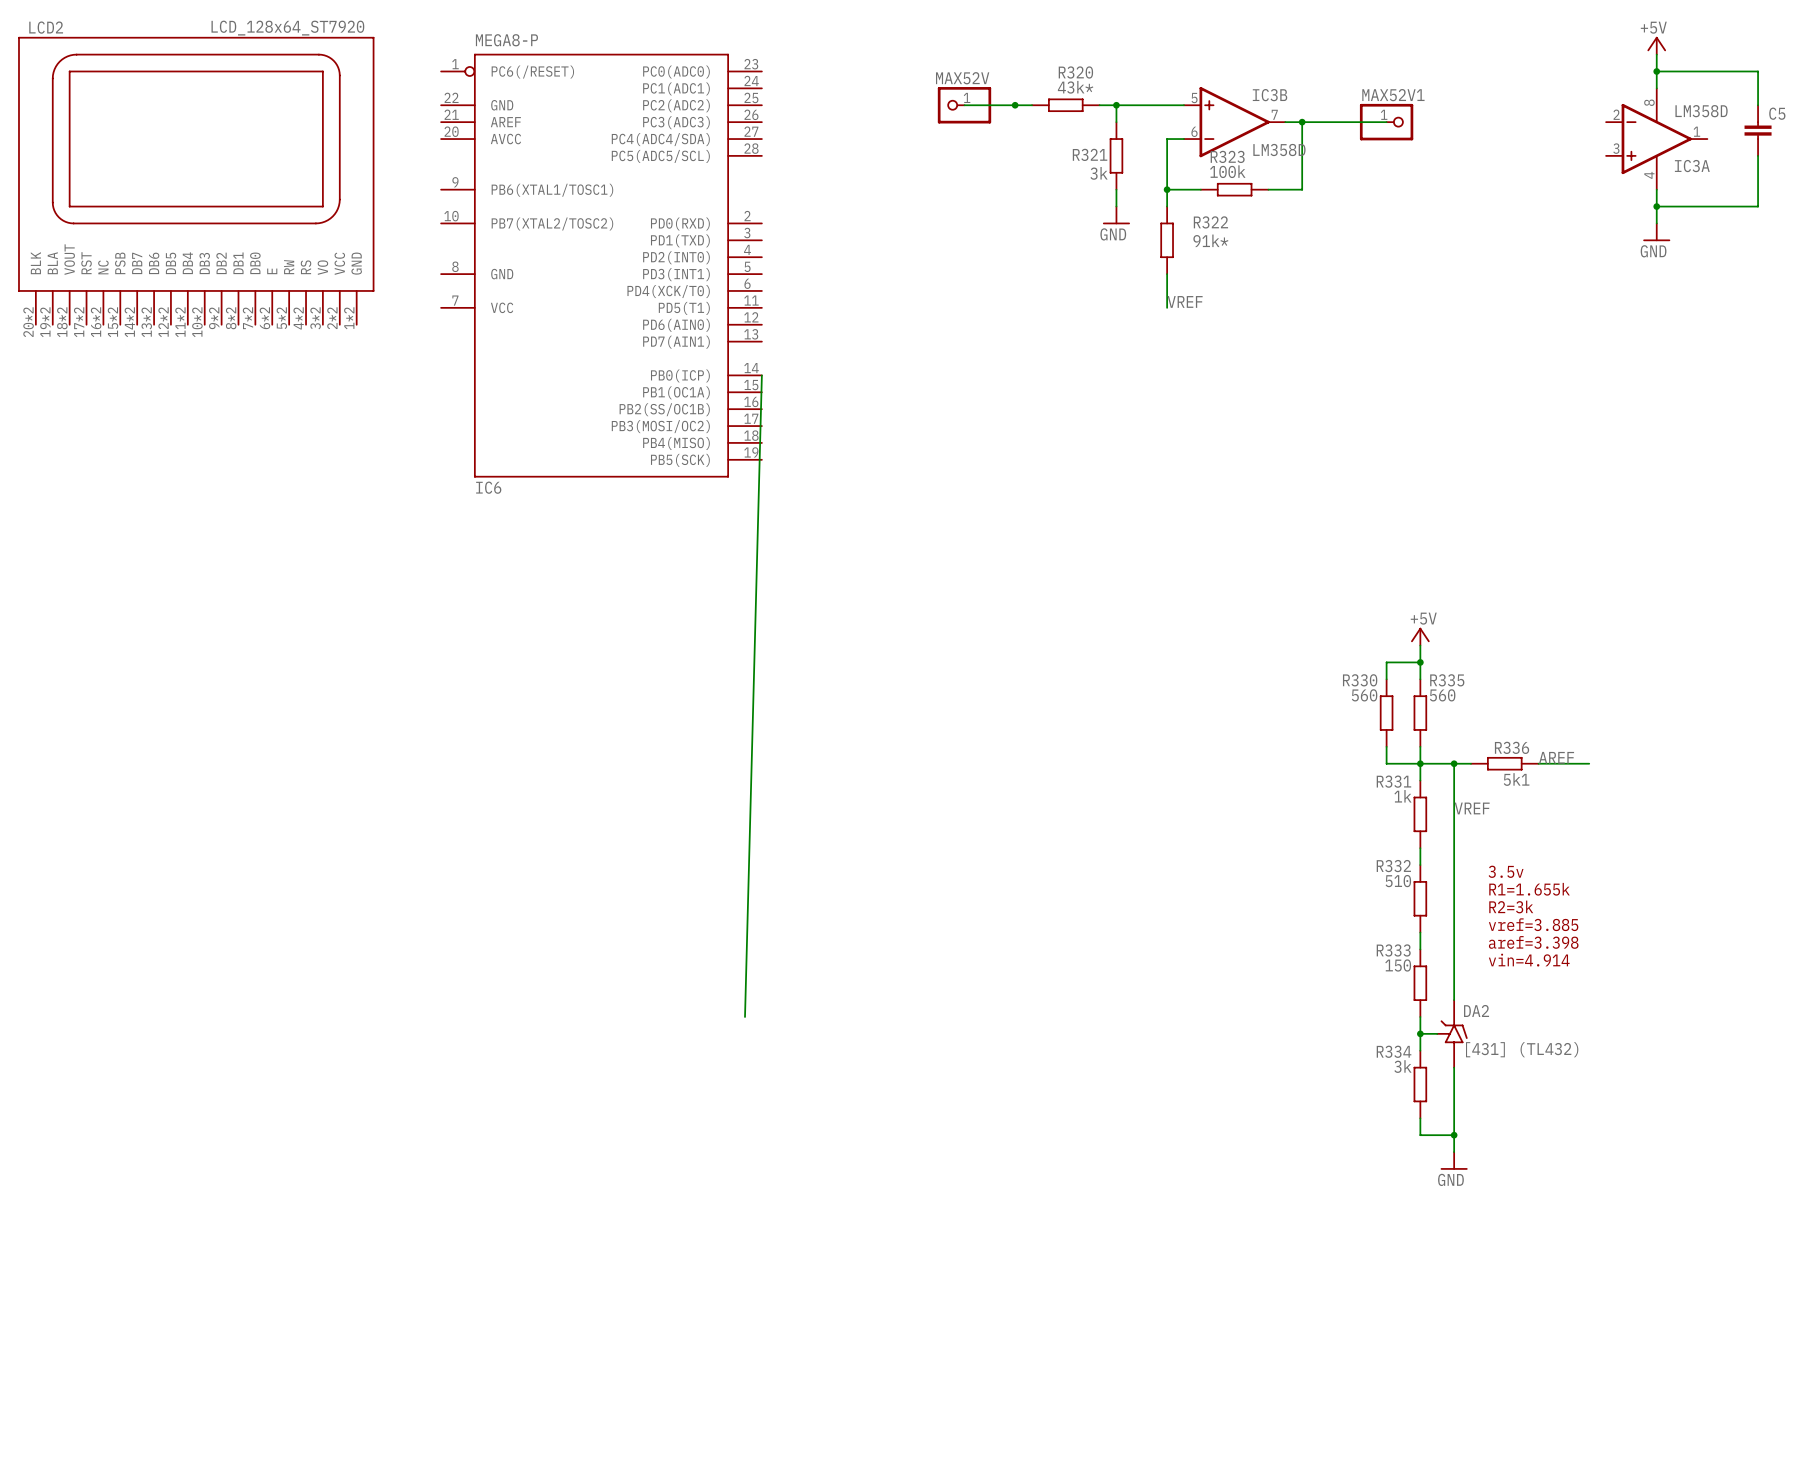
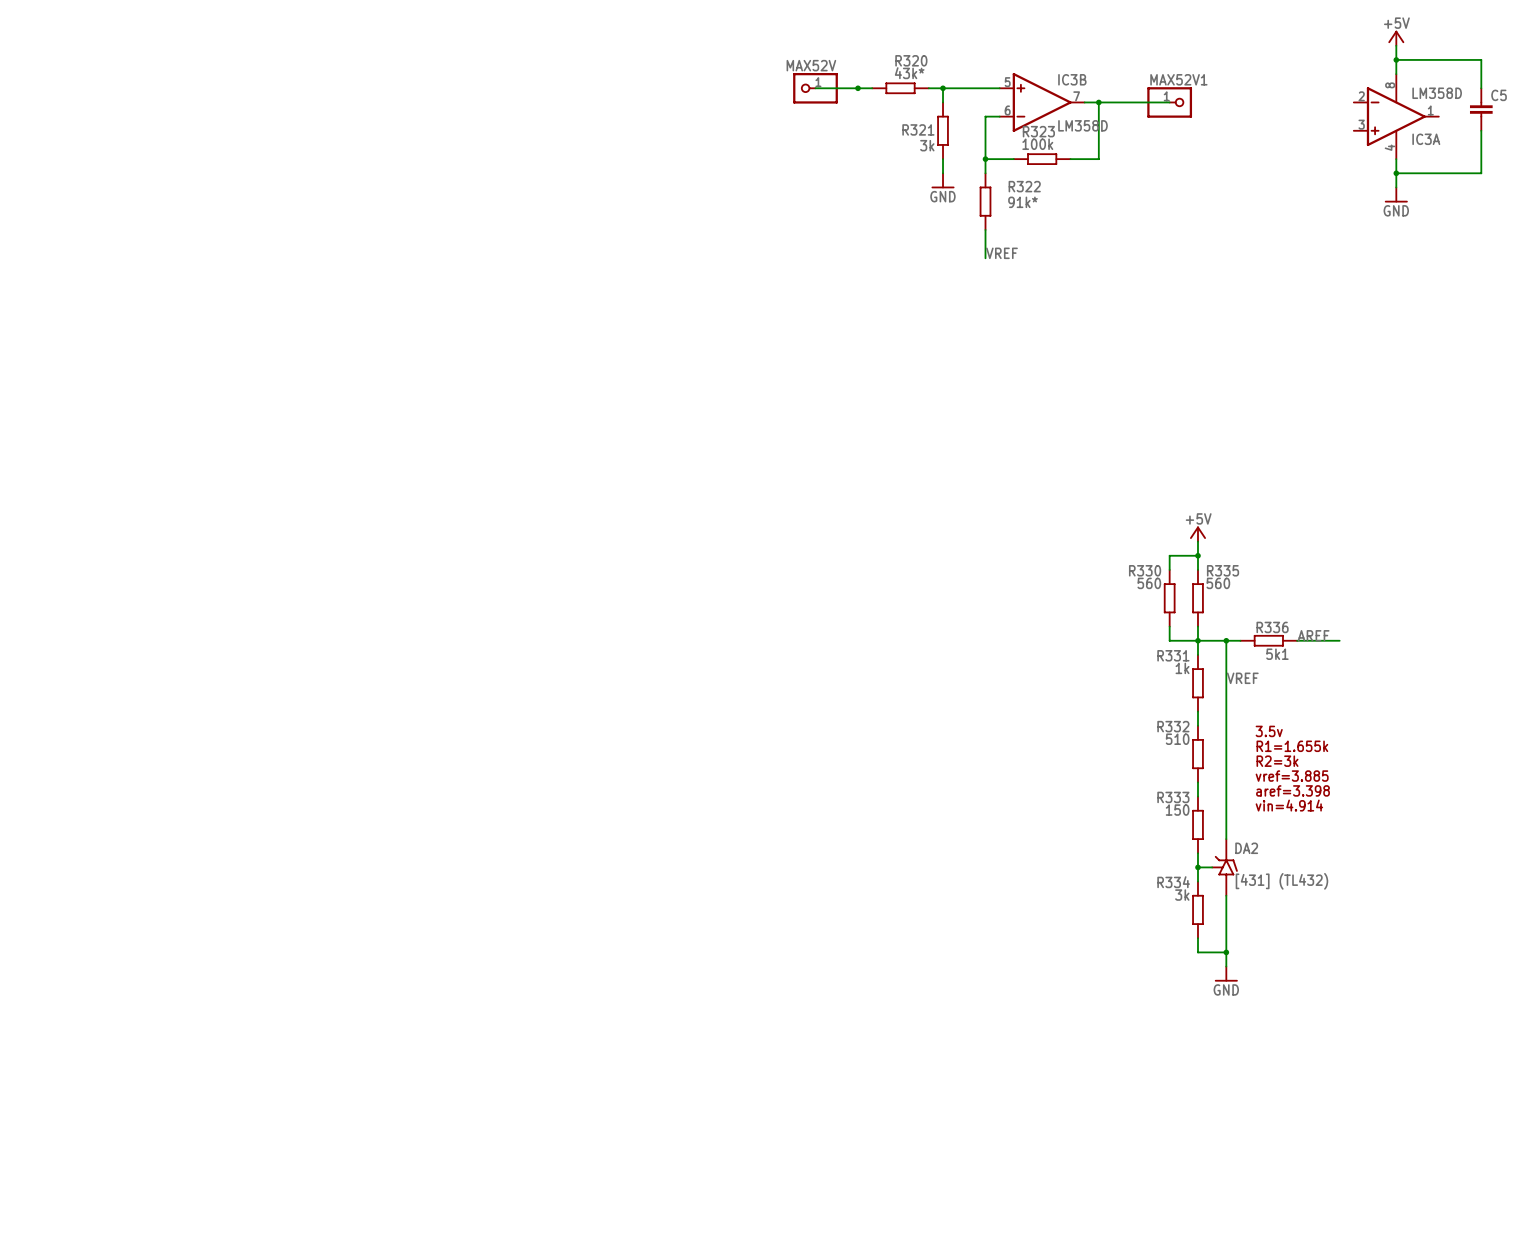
LCD2: LCD_128x64_ST7920 (196, 180) -> none
IC6: MEGA8-P (601, 265) -> none
wire: (761, 375) (745, 1016) -> none

